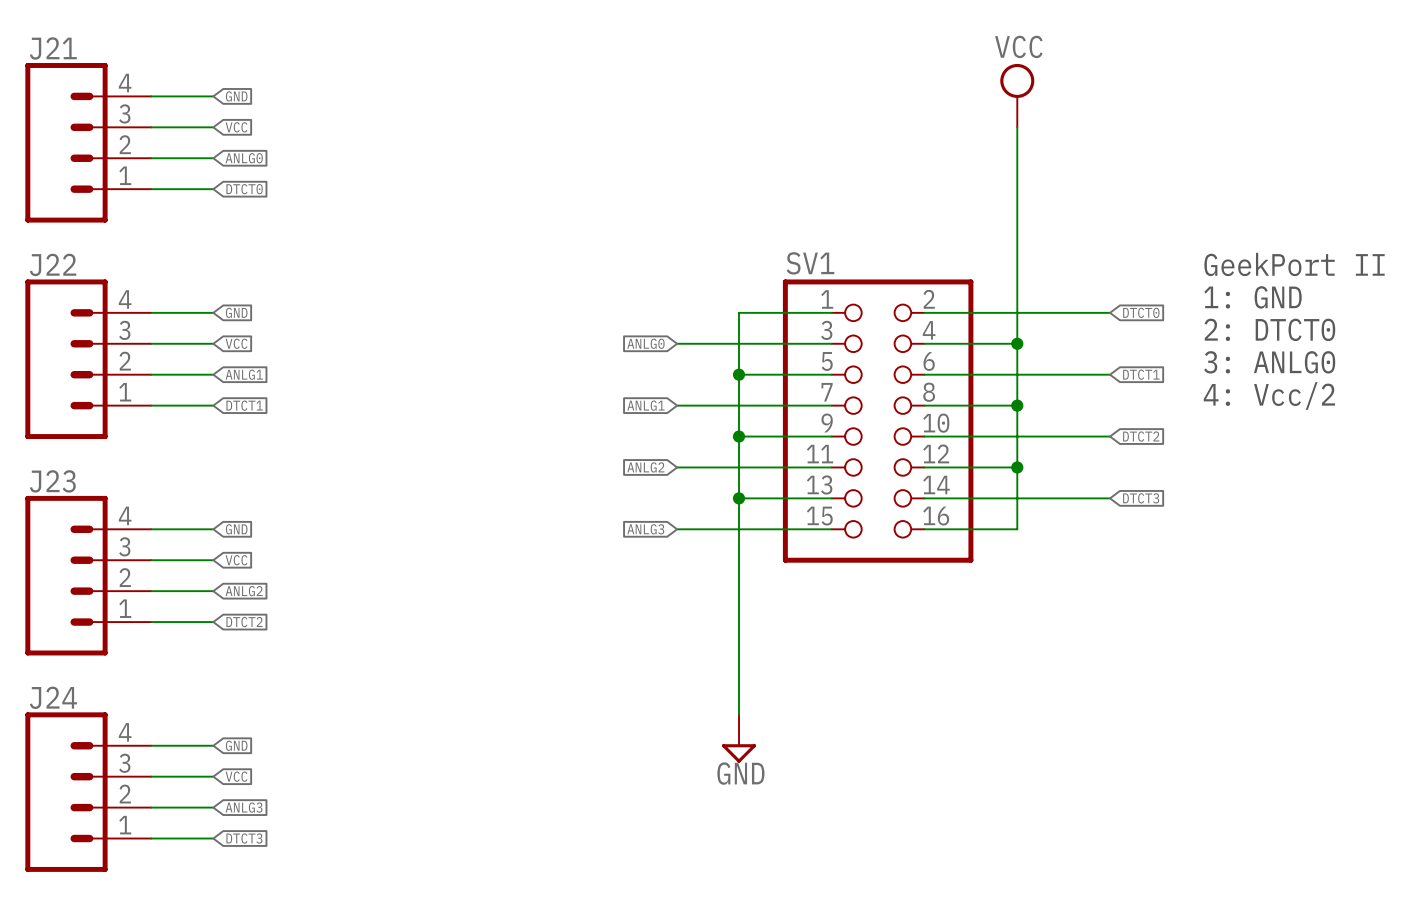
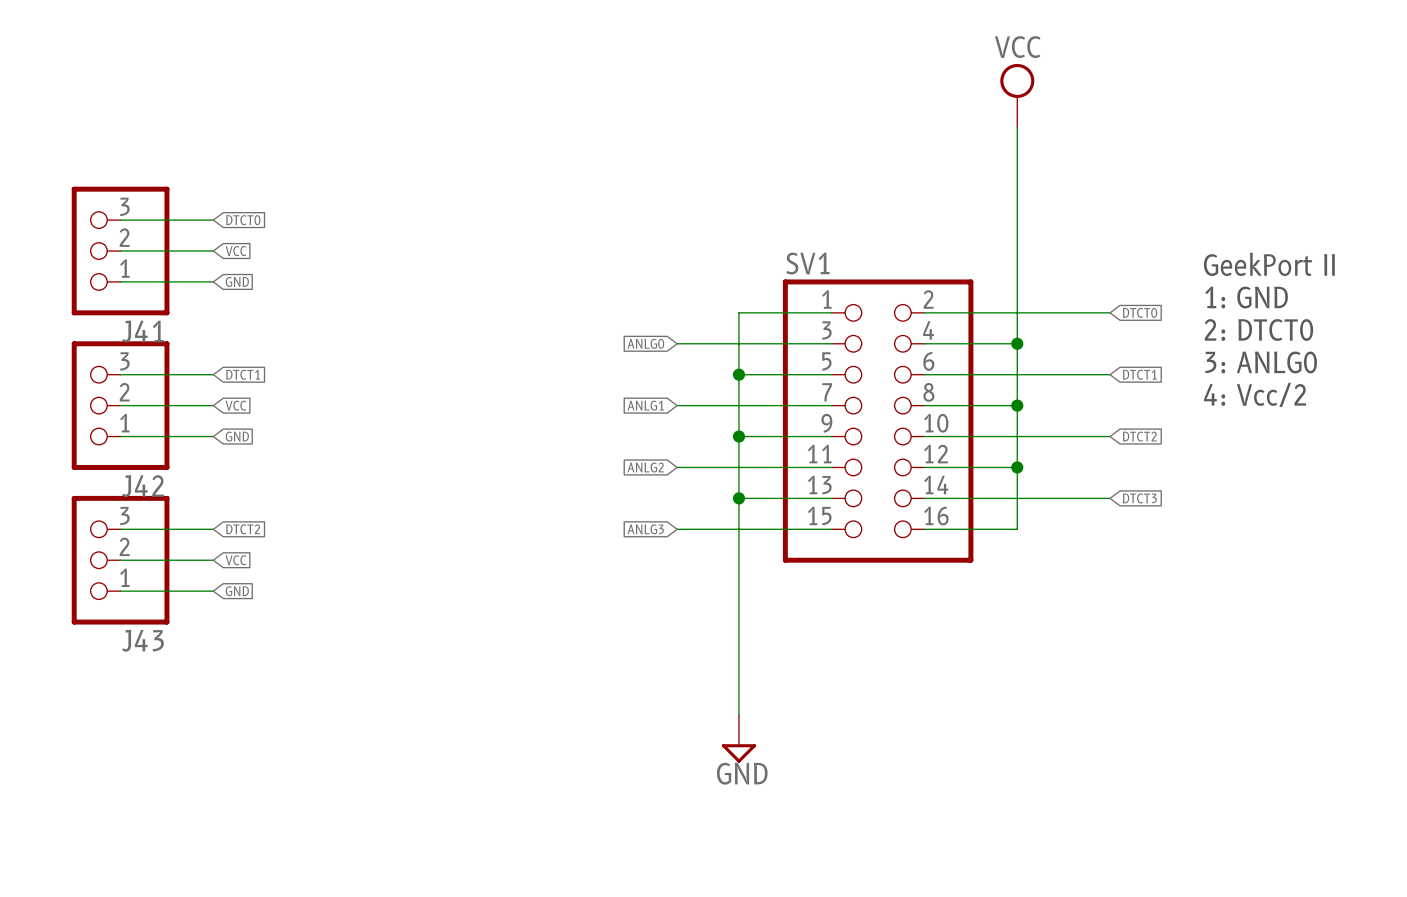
wire: (151, 96) (213, 96) -> none
global label: GND (236, 96) -> none
wire: (151, 127) (213, 127) -> none
global label: VCC (236, 127) -> none
J21: (88, 142) -> none
wire: (151, 158) (213, 158) -> none
global label: ANLG0 (244, 158) -> none
wire: (151, 189) (213, 189) -> none
global label position: DTCT0 (244, 189) -> DTCT0 (243, 220)
wire: none -> (120, 220) (213, 220)
wire: none -> (120, 251) (213, 251)
J41: none -> (120, 251)
global label: none -> VCC (236, 251)
wire: none -> (120, 281) (213, 281)
wire: (151, 312) (213, 312) -> none
global label position: GND (236, 312) -> GND (237, 281)
wire: (151, 343) (213, 343) -> none
global label: VCC (236, 343) -> none
J22: (88, 359) -> none
global label: ANLG1 (244, 374) -> DTCT1 (243, 374)
J42: none -> (120, 405)
global label: DTCT1 (244, 405) -> VCC (236, 405)
wire: none -> (120, 436) (213, 436)
global label: none -> GND (237, 436)
global label: GND (236, 529) -> DTCT2 (243, 529)
J43: none -> (120, 560)
J23: (88, 575) -> none
global label: ANLG2 (244, 591) -> GND (237, 591)
wire: (151, 622) (213, 622) -> none
global label: DTCT2 (244, 622) -> none
wire: (151, 745) (213, 745) -> none
global label: GND (236, 745) -> none
wire: (151, 776) (213, 776) -> none
global label: VCC (236, 776) -> none
J24: (88, 792) -> none
wire: (151, 807) (213, 807) -> none
global label: ANLG3 (244, 807) -> none
wire: (151, 838) (213, 838) -> none
global label: DTCT3 (244, 838) -> none

